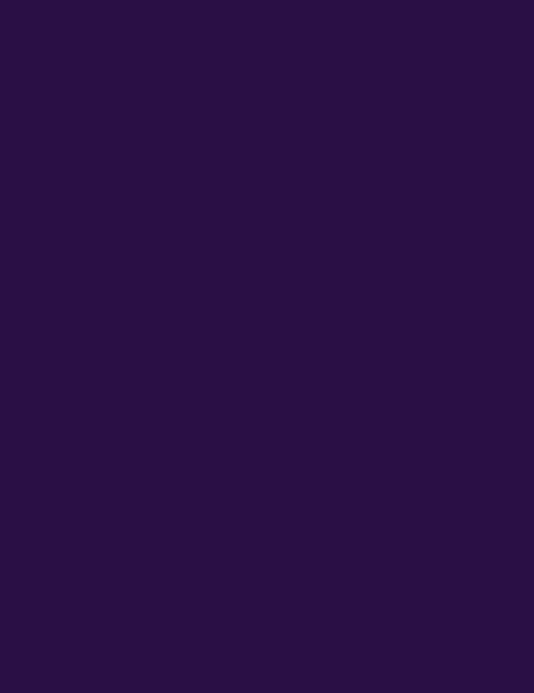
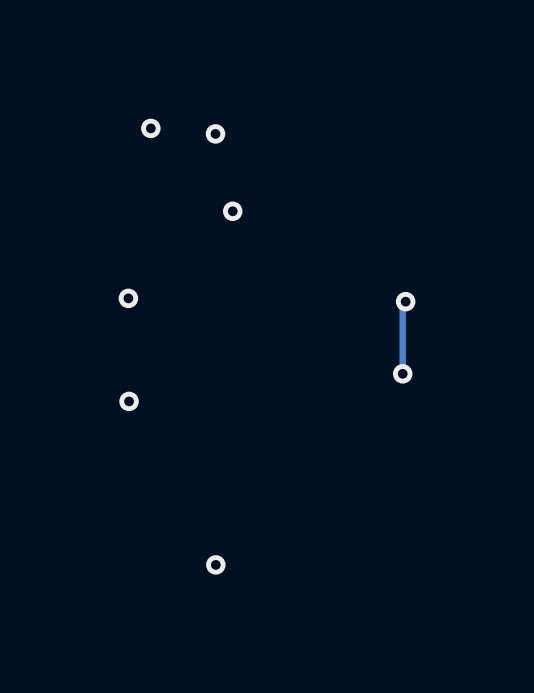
via: none -> (150, 128)
via: none -> (215, 133)
via: none -> (232, 211)
via: none -> (128, 298)
track: none -> (405, 301) (402, 304) (402, 373)
via: none -> (405, 301)
via: none -> (402, 373)
via: none -> (129, 401)
via: none -> (215, 564)

